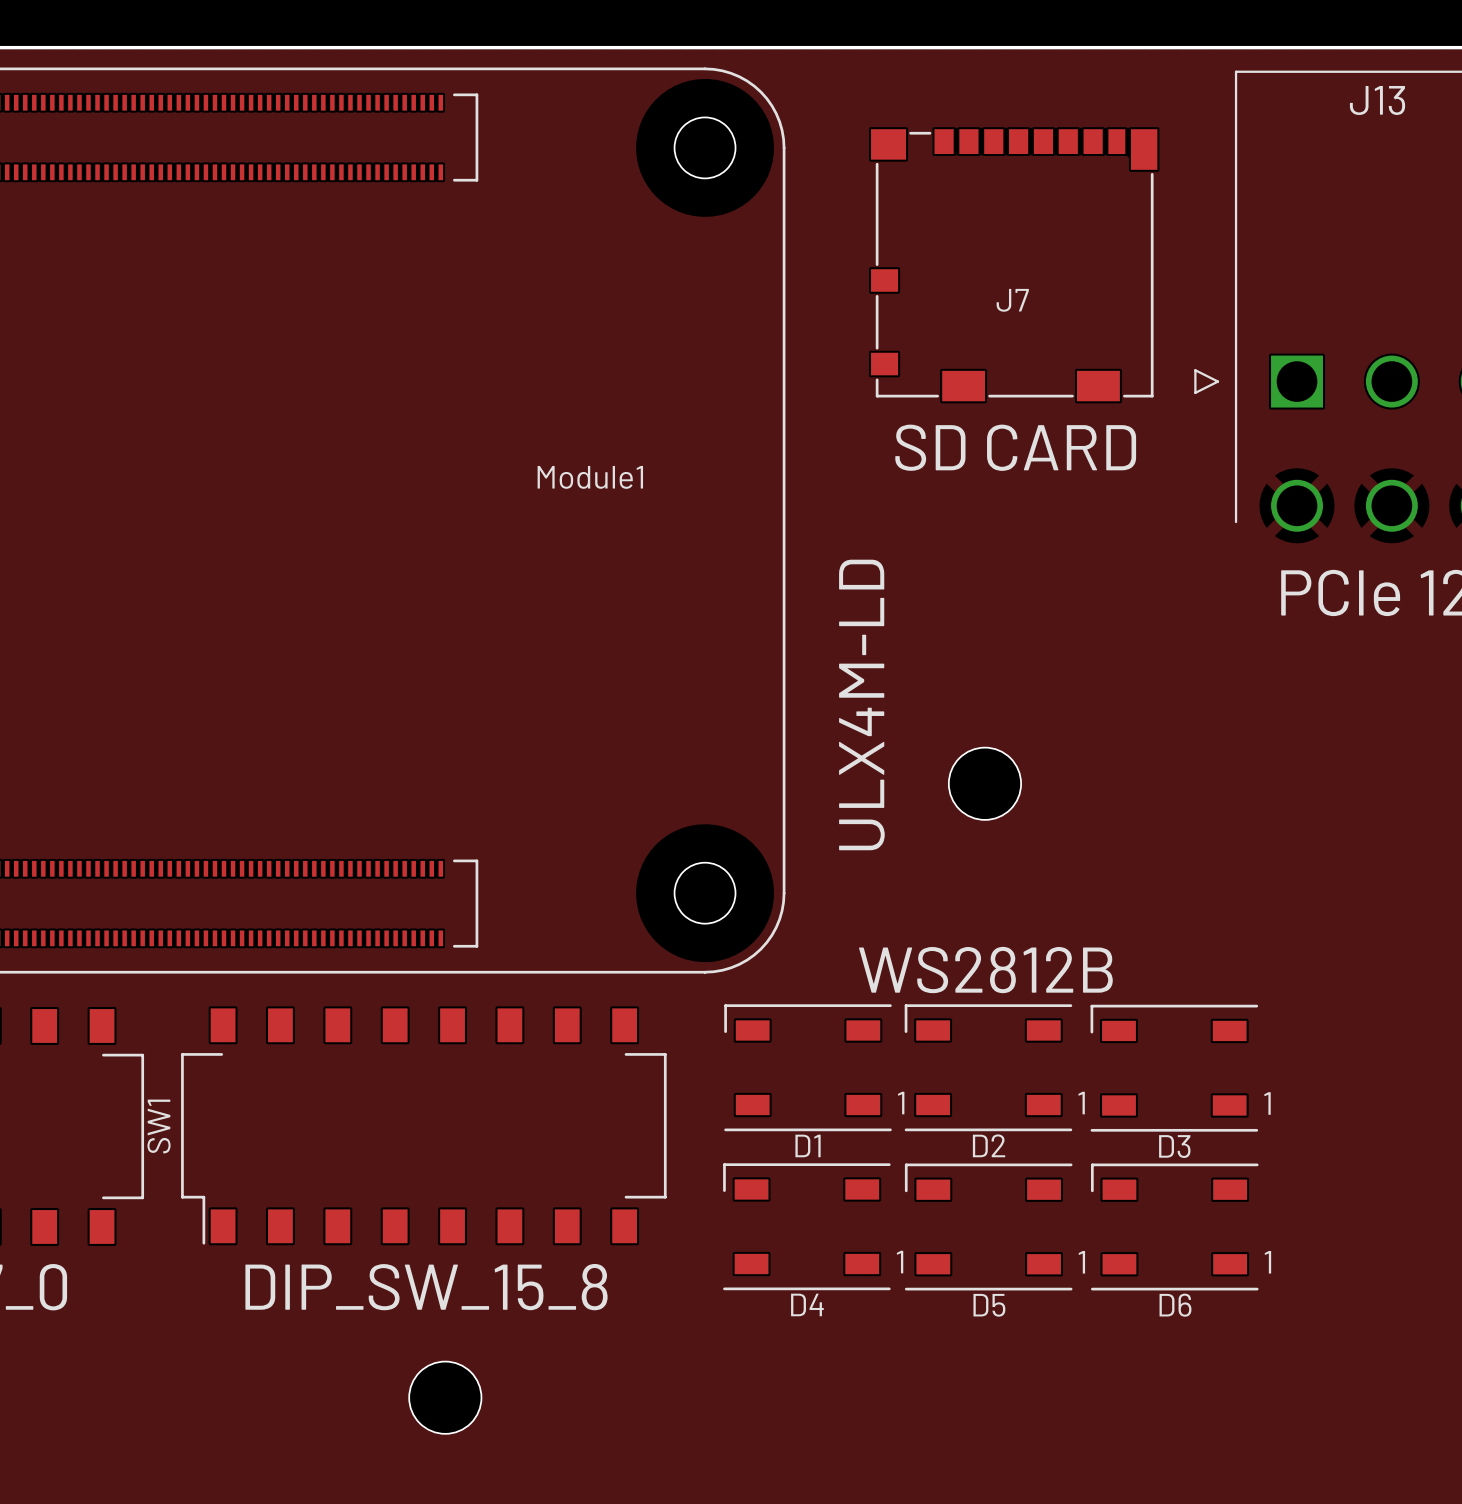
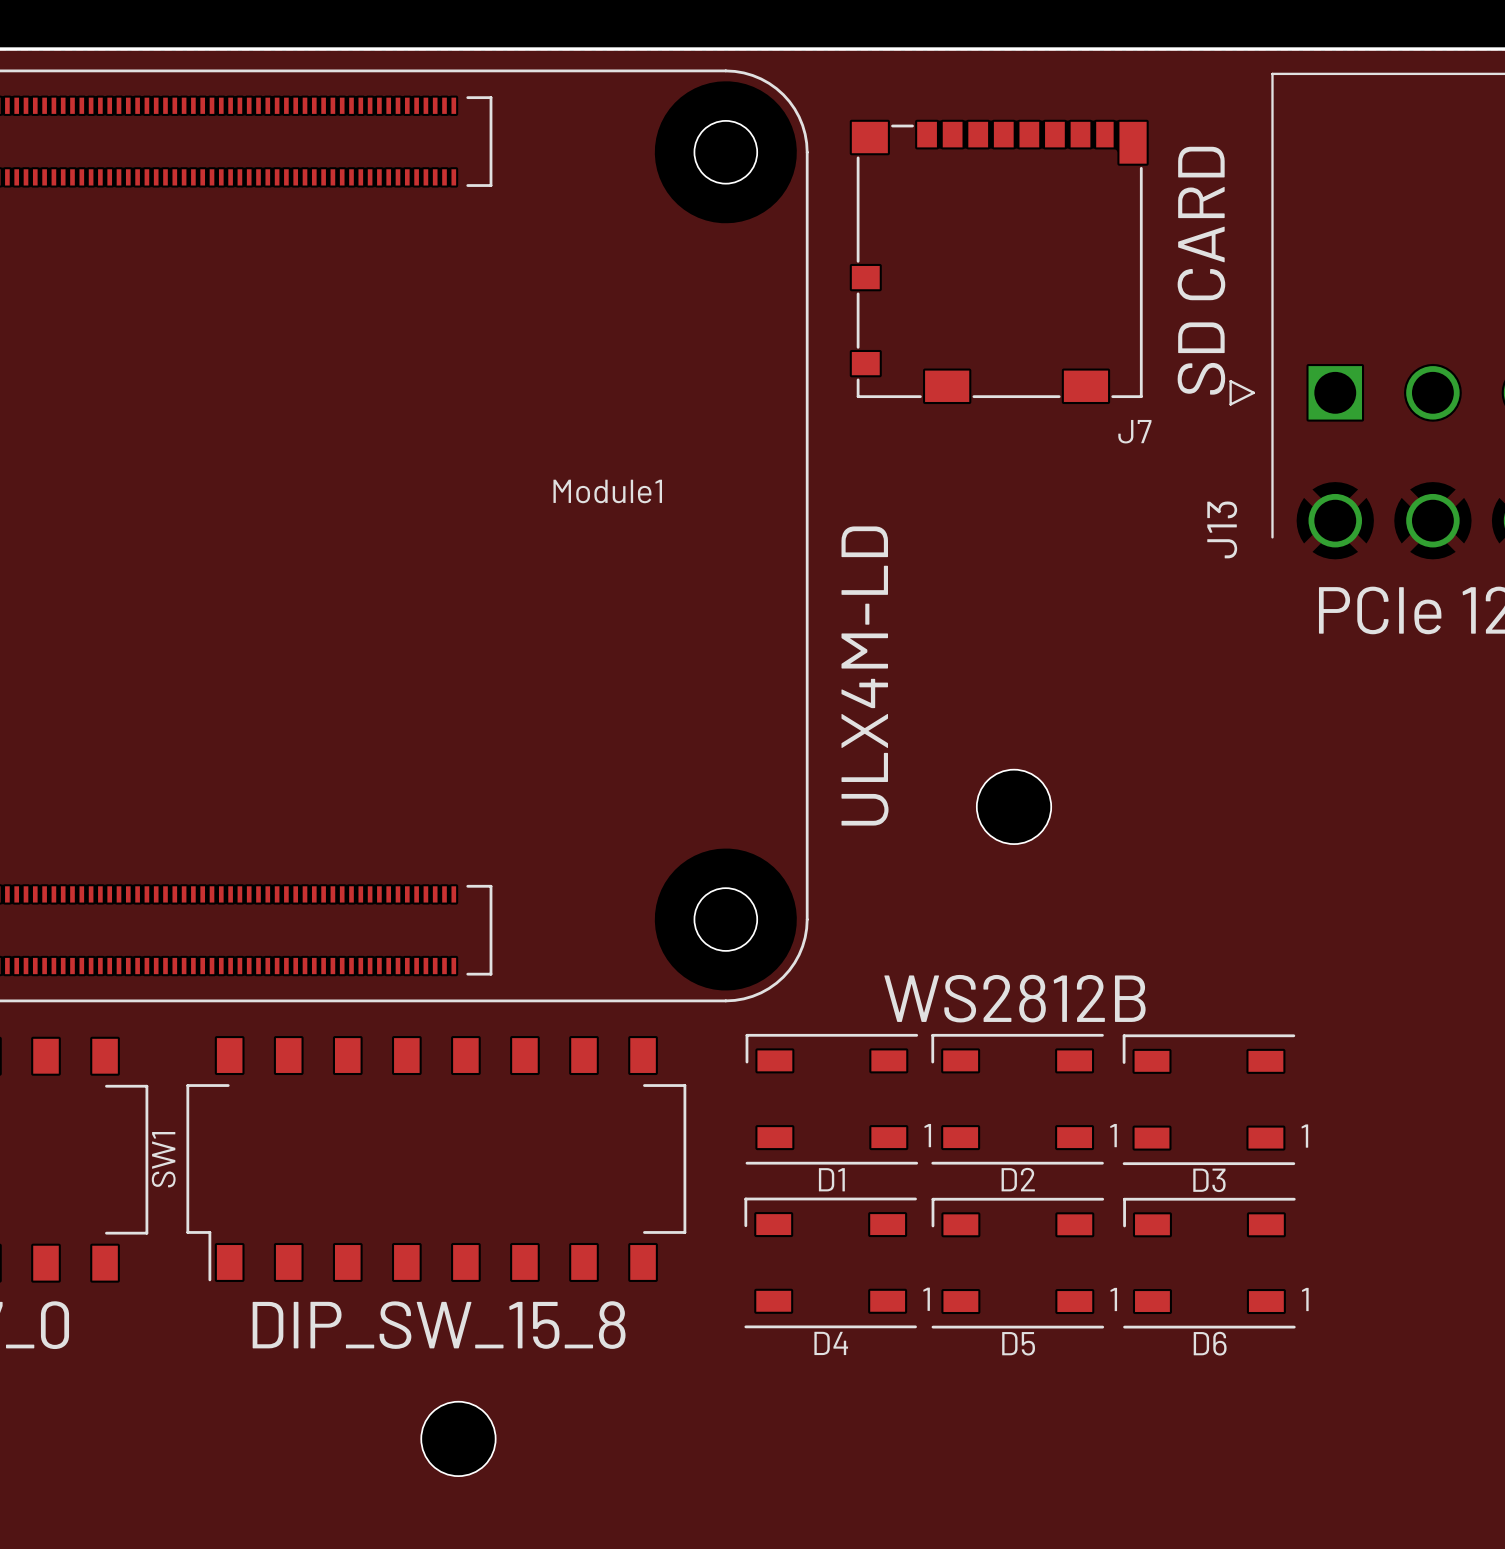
J13 name rotation: 0° (1377, 100) -> 90° counterclockwise (1222, 529)
J13 name position: J13 (1377, 100) -> J13 (1222, 529)
J7 position: (1014, 265) -> (999, 261)
J7 name position: J7 (1012, 300) -> J7 (1134, 431)
text rotation: 0° (1015, 447) -> 90° counterclockwise (1201, 270)
text position: ULX4M-LD (861, 704) -> ULX4M-LD (865, 676)

